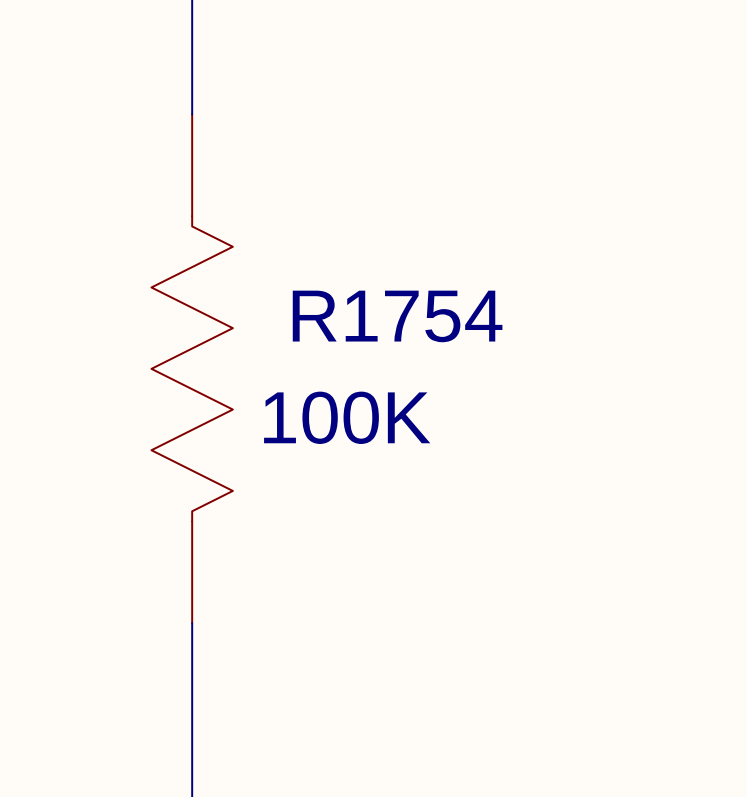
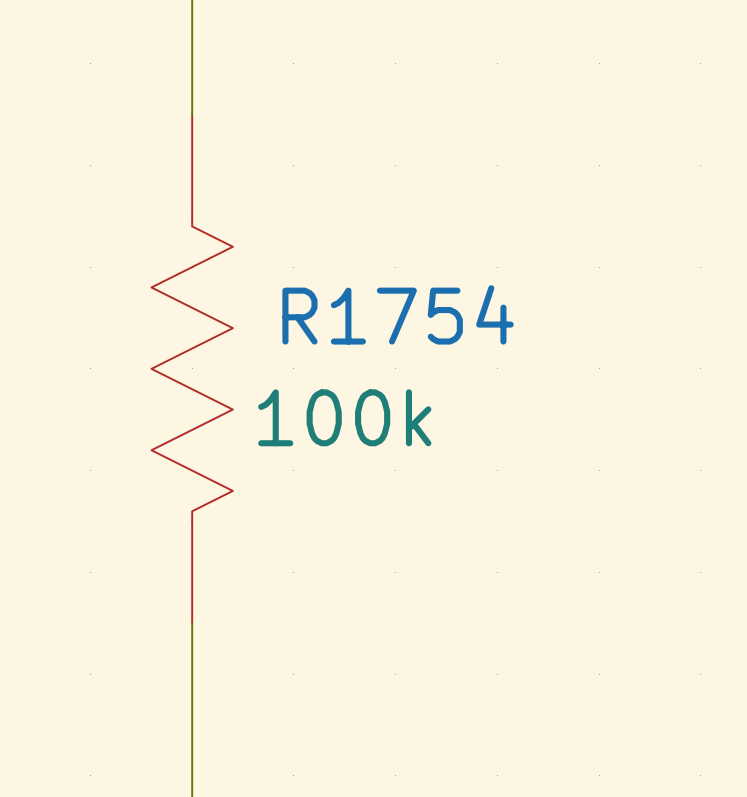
R1754 value: 100K (347, 417) -> 100k (344, 417)

